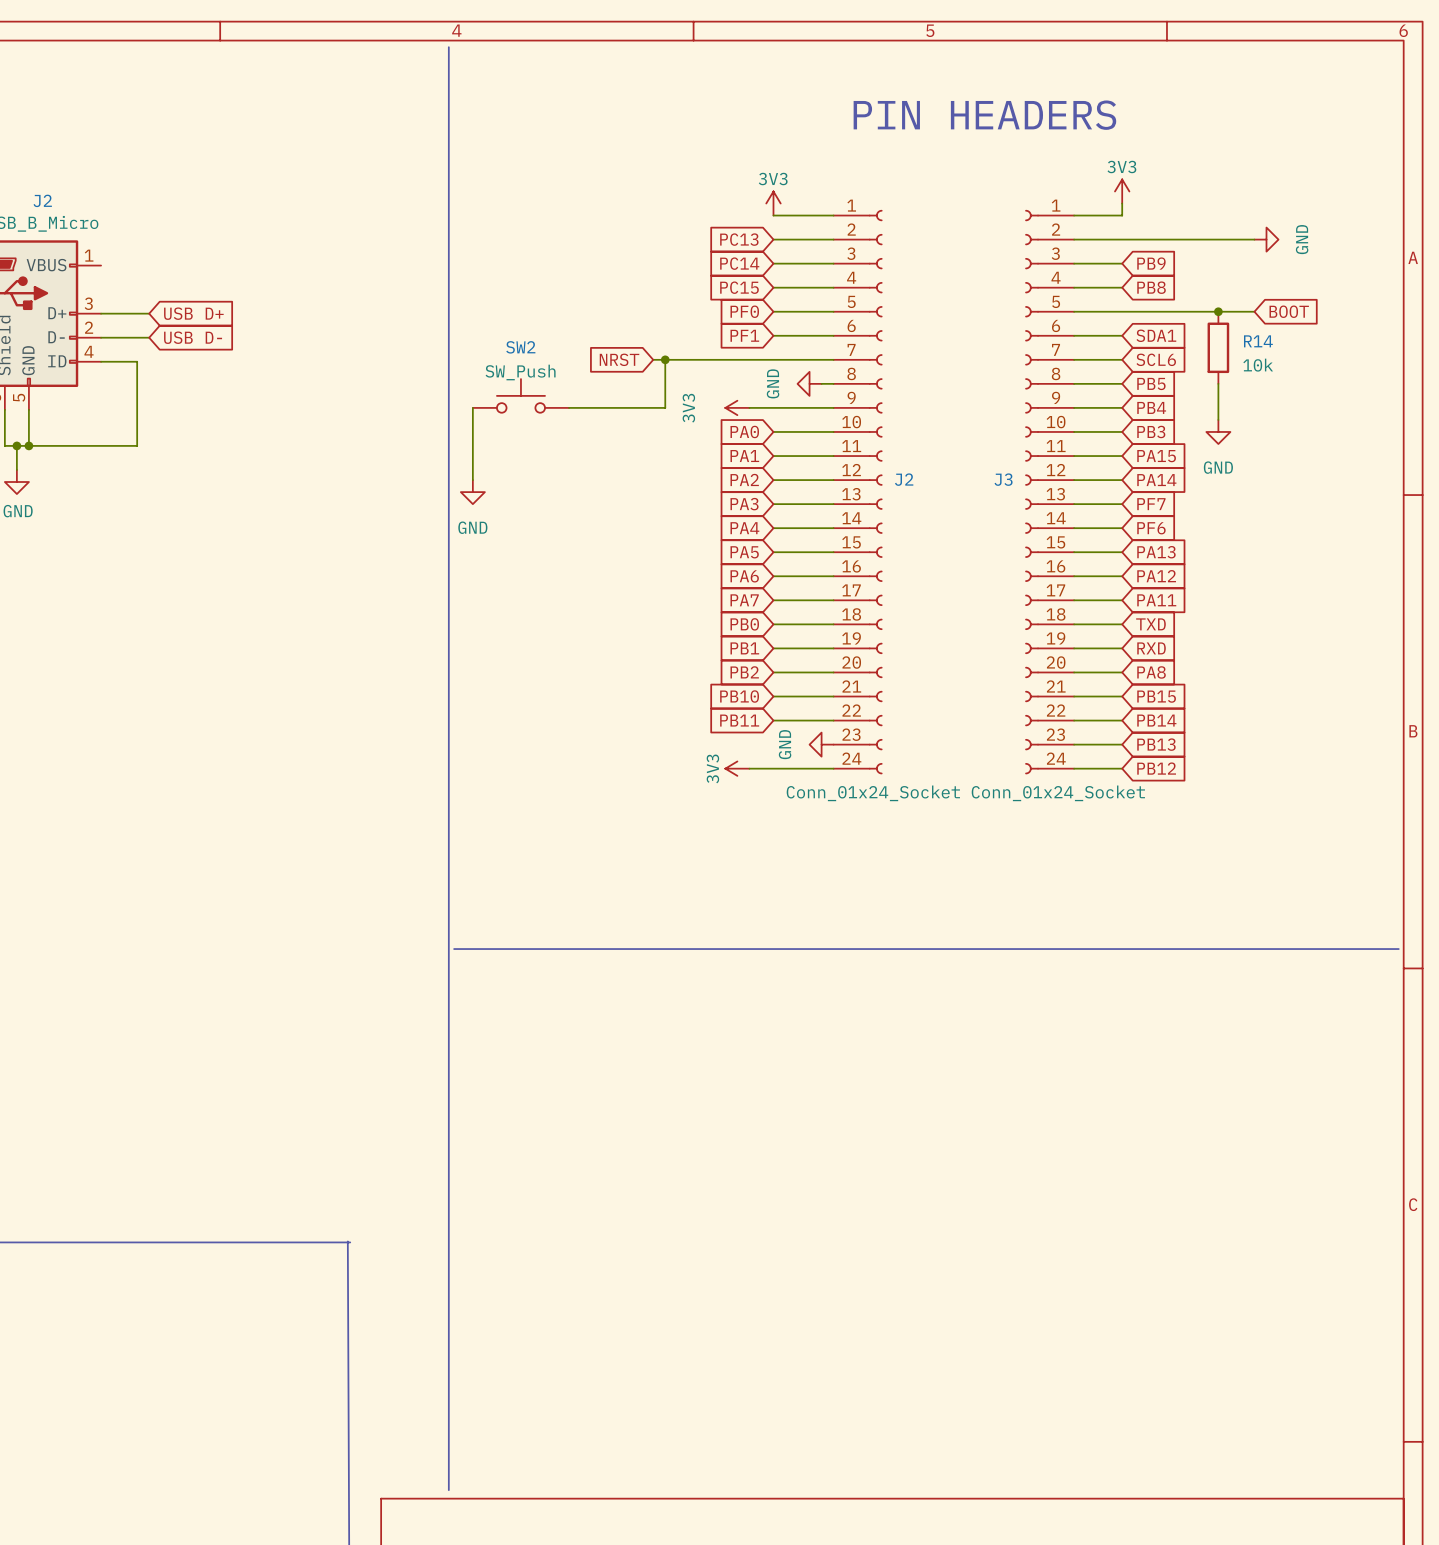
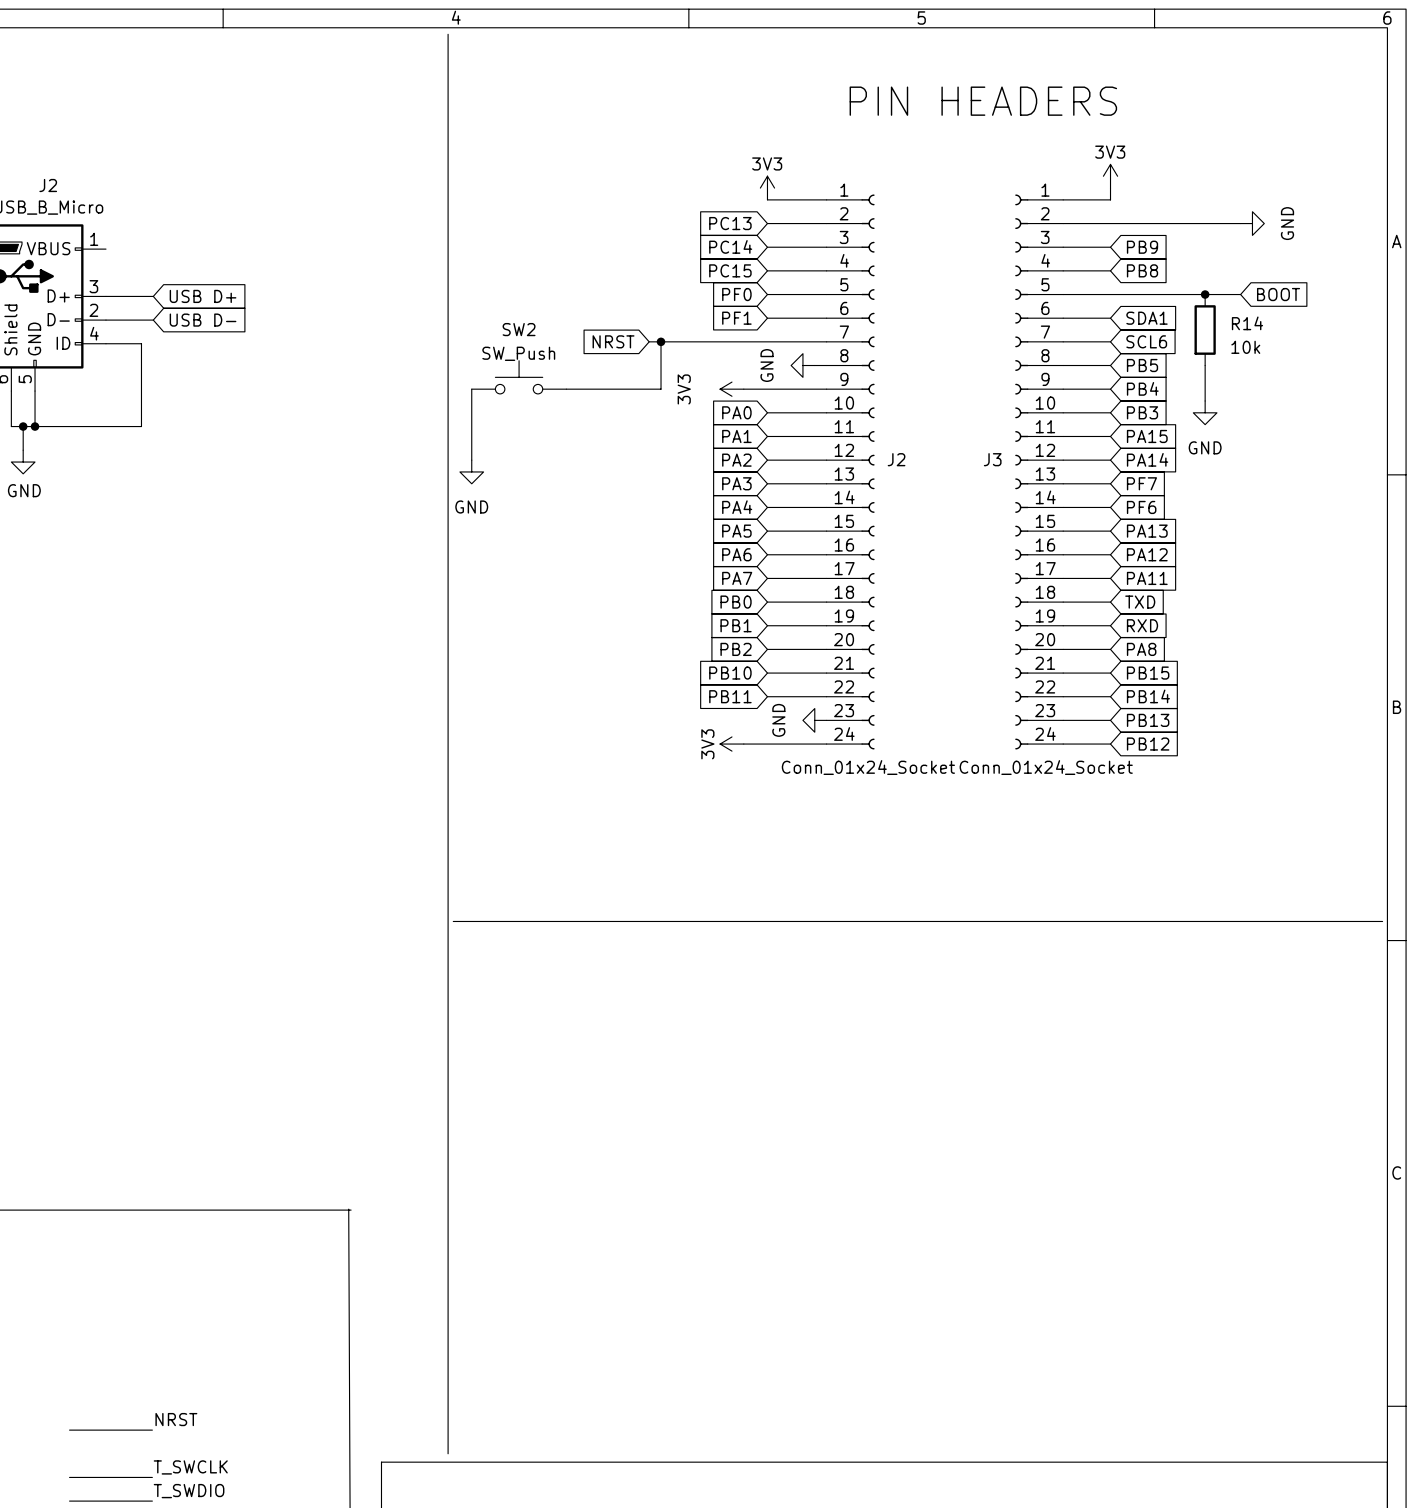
label: none -> NRST (176, 1419)
wire: none -> (69, 1430) (152, 1430)
label: none -> T_SWCLK (190, 1467)
wire: none -> (69, 1477) (152, 1477)
label: none -> T_SWDIO (189, 1491)
wire: none -> (69, 1501) (152, 1501)

